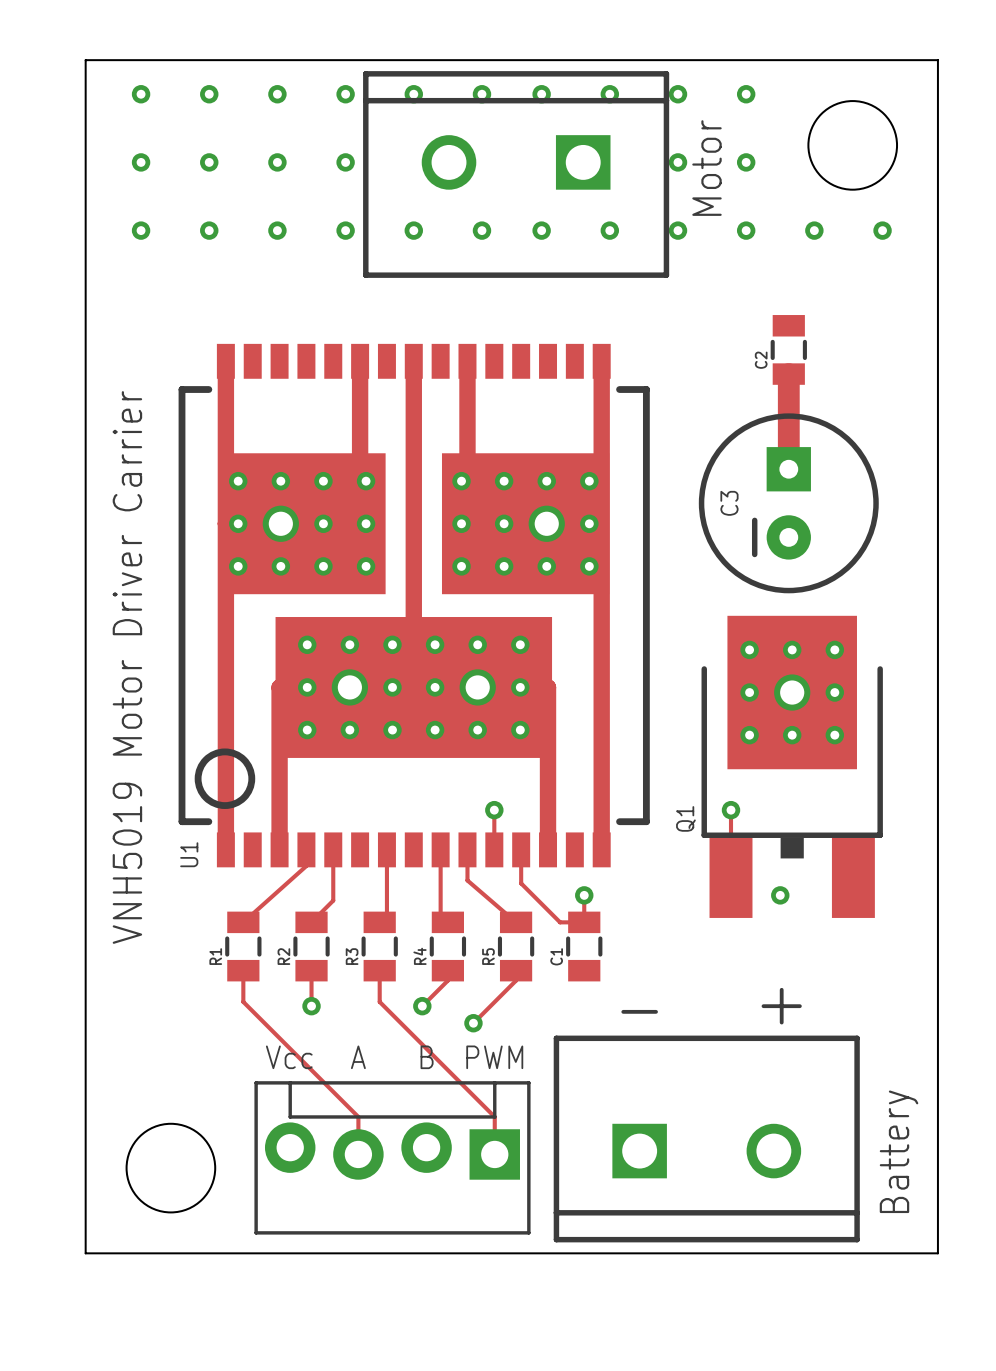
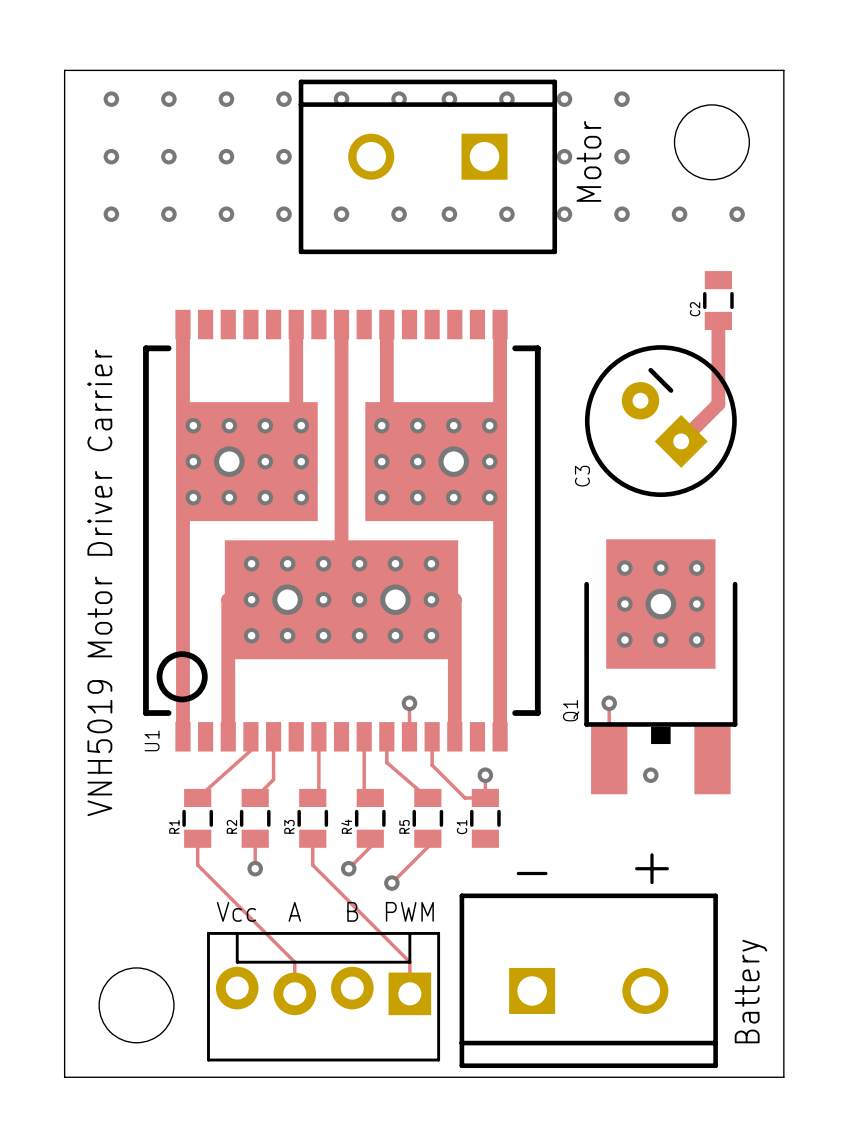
C2 position: (788, 349) -> (718, 300)
track: none -> (718, 320) (718, 404) (681, 441)
track: (788, 374) (788, 469) -> none
C3 name position: C3 (729, 503) -> C3 (582, 476)
C3 rotation: 0° (788, 503) -> 135° clockwise (660, 421)

